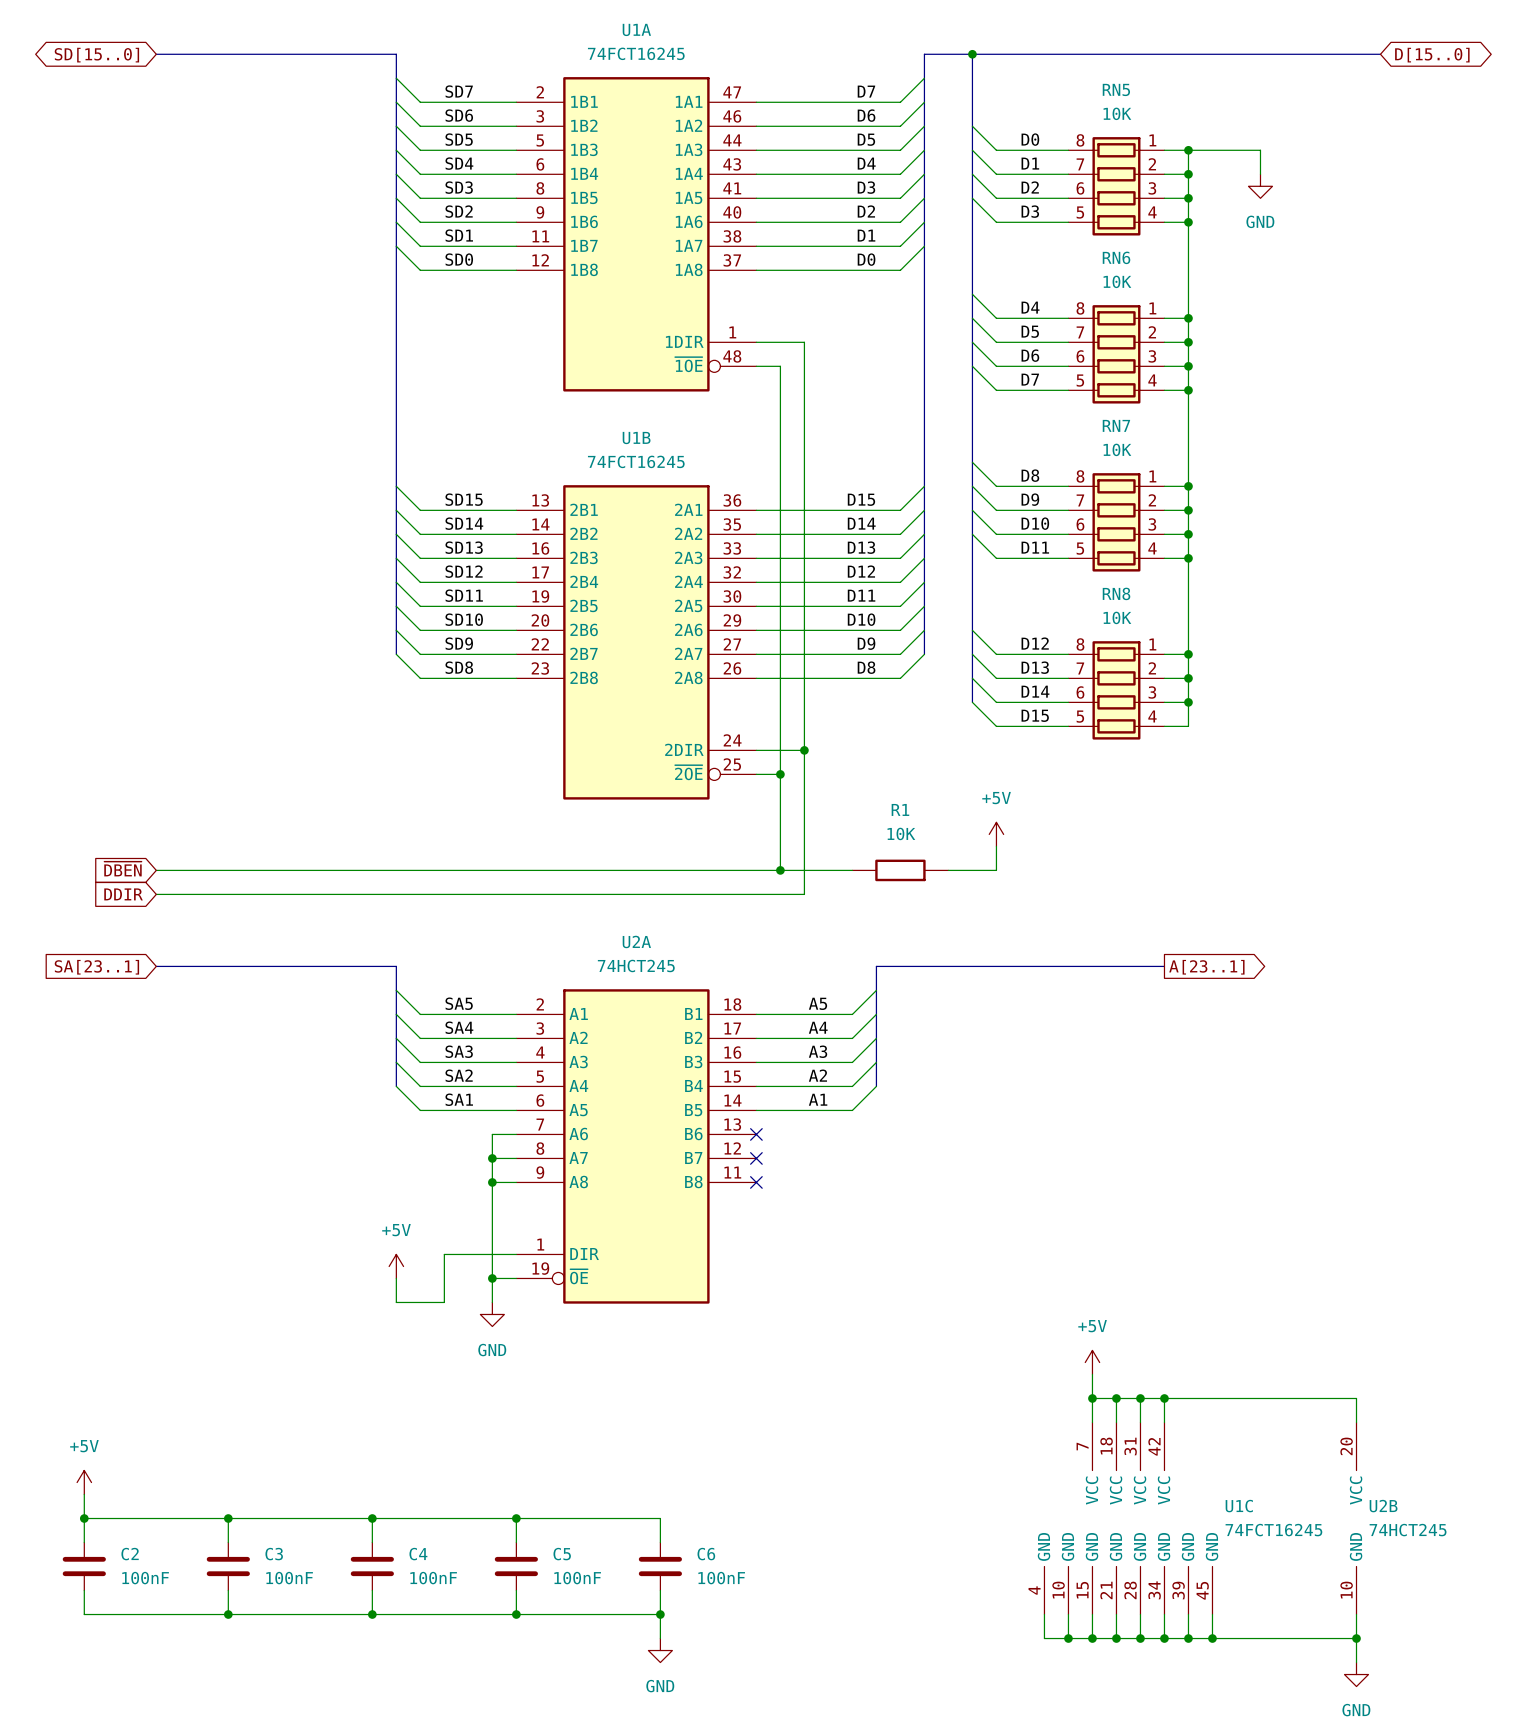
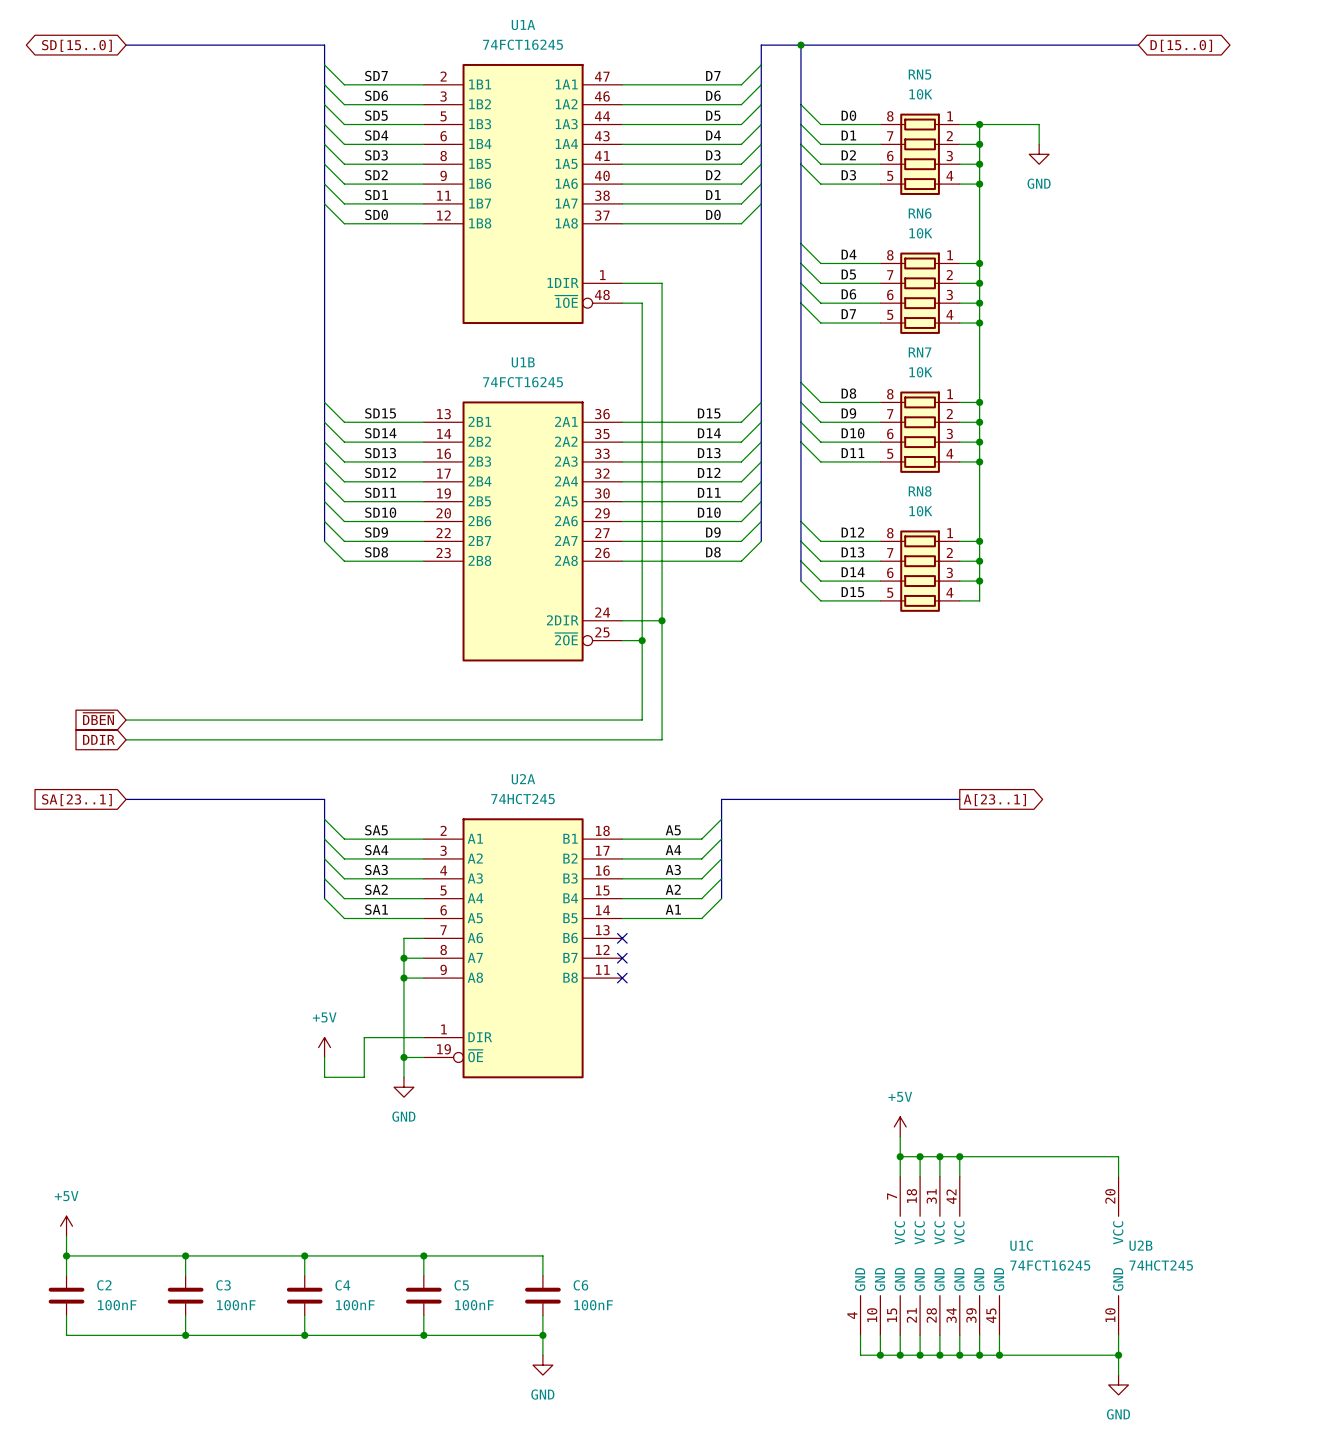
power symbol: +5V (996, 834) -> none
wire: (996, 846) (996, 870) (948, 870) -> none
wire: (780, 870) (852, 870) -> none
junction: (780, 870) -> none
R1: 10K (900, 870) -> none

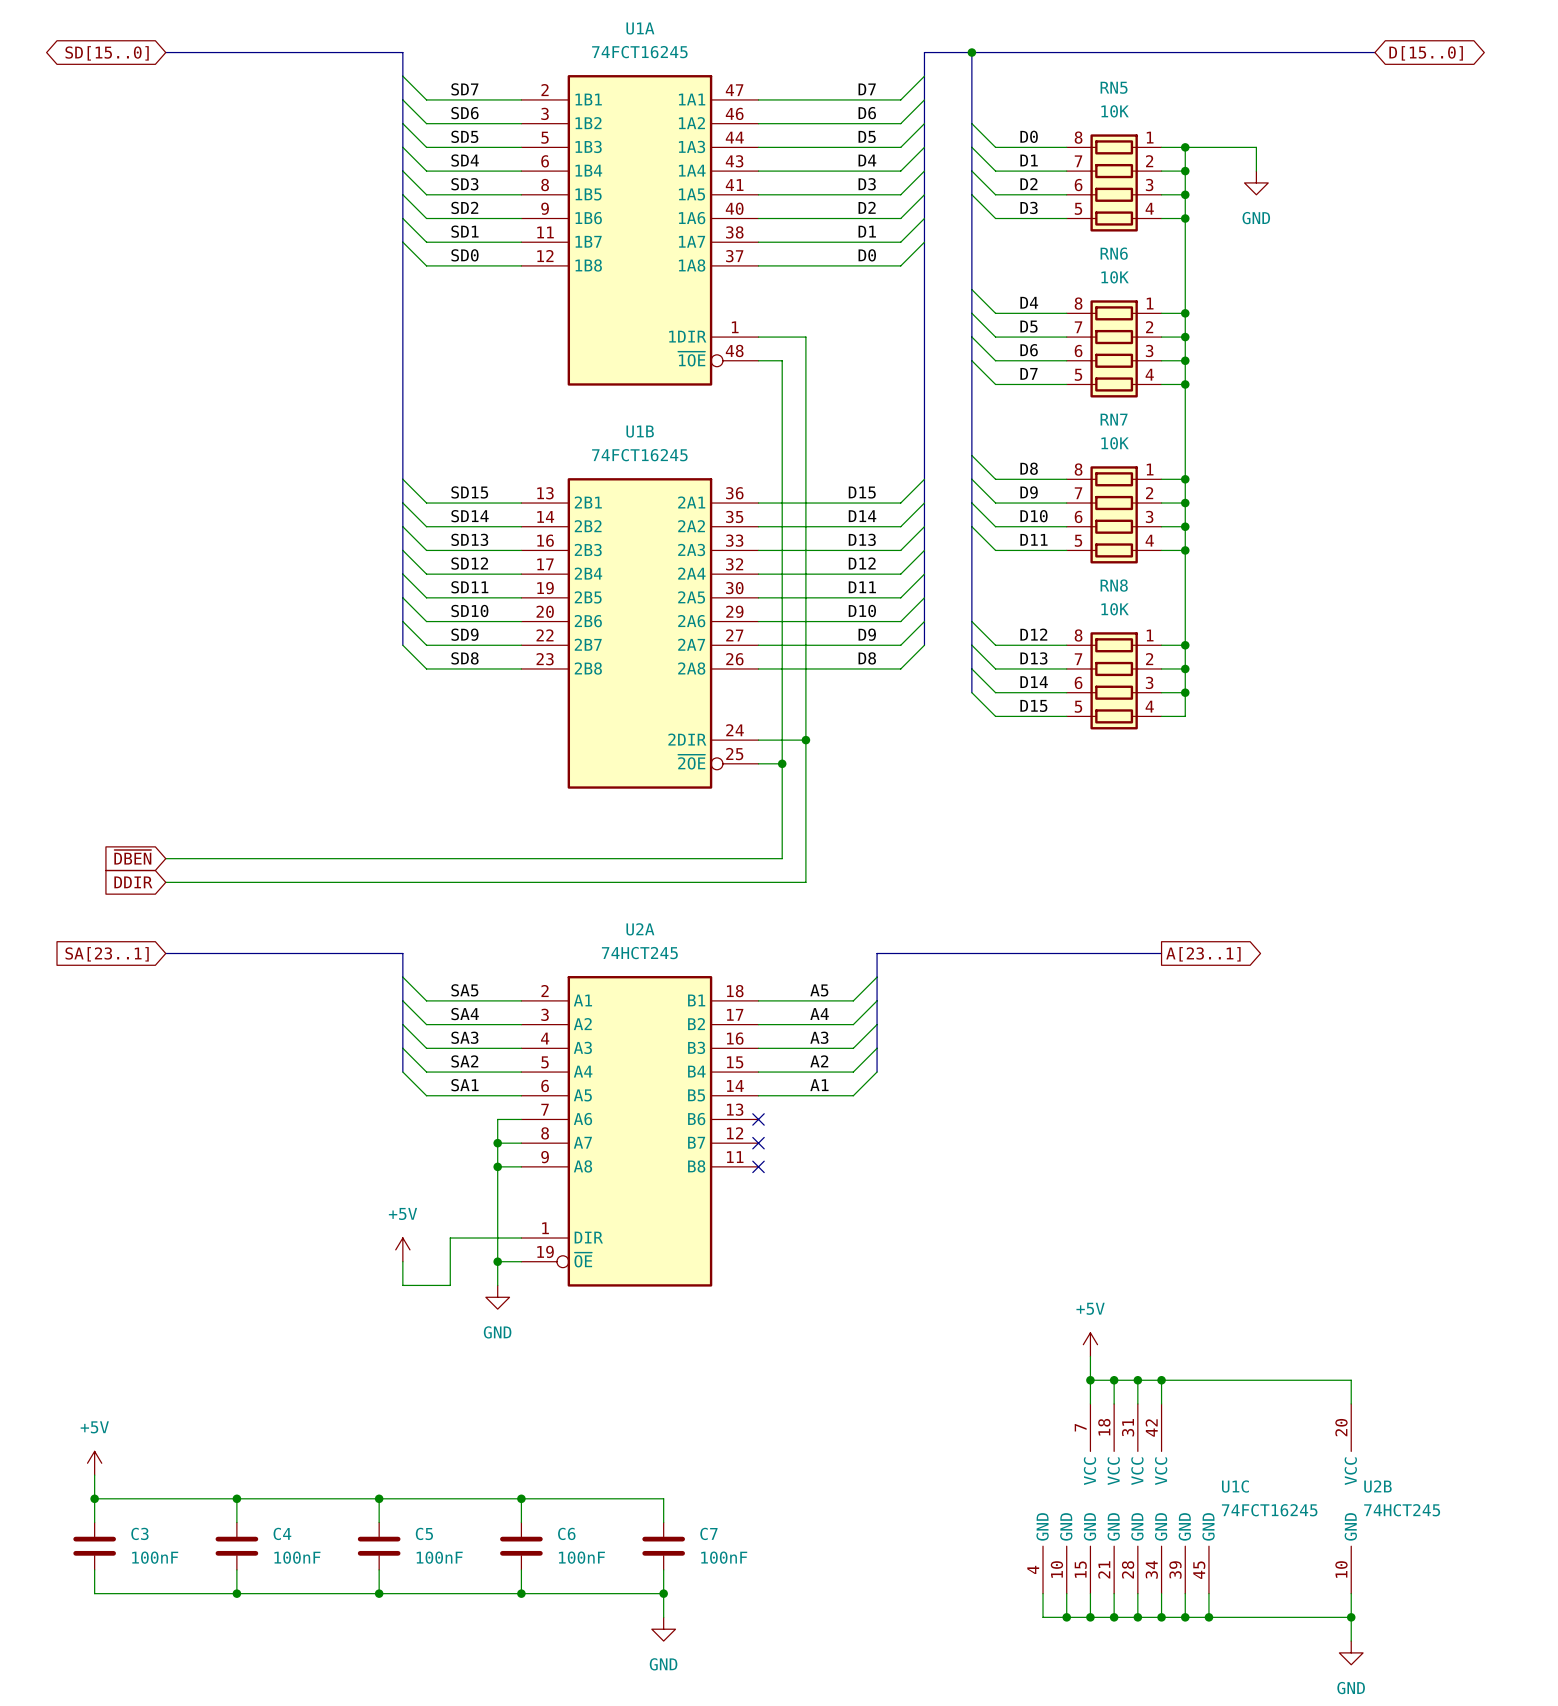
C2 name: C2 (104, 1285) -> C3 (139, 1533)
C3 name: C3 (223, 1285) -> C4 (282, 1533)
C4 name: C4 (342, 1285) -> C5 (424, 1533)
C5 name: C5 (461, 1285) -> C6 (566, 1533)
C6 name: C6 (580, 1285) -> C7 (708, 1533)

